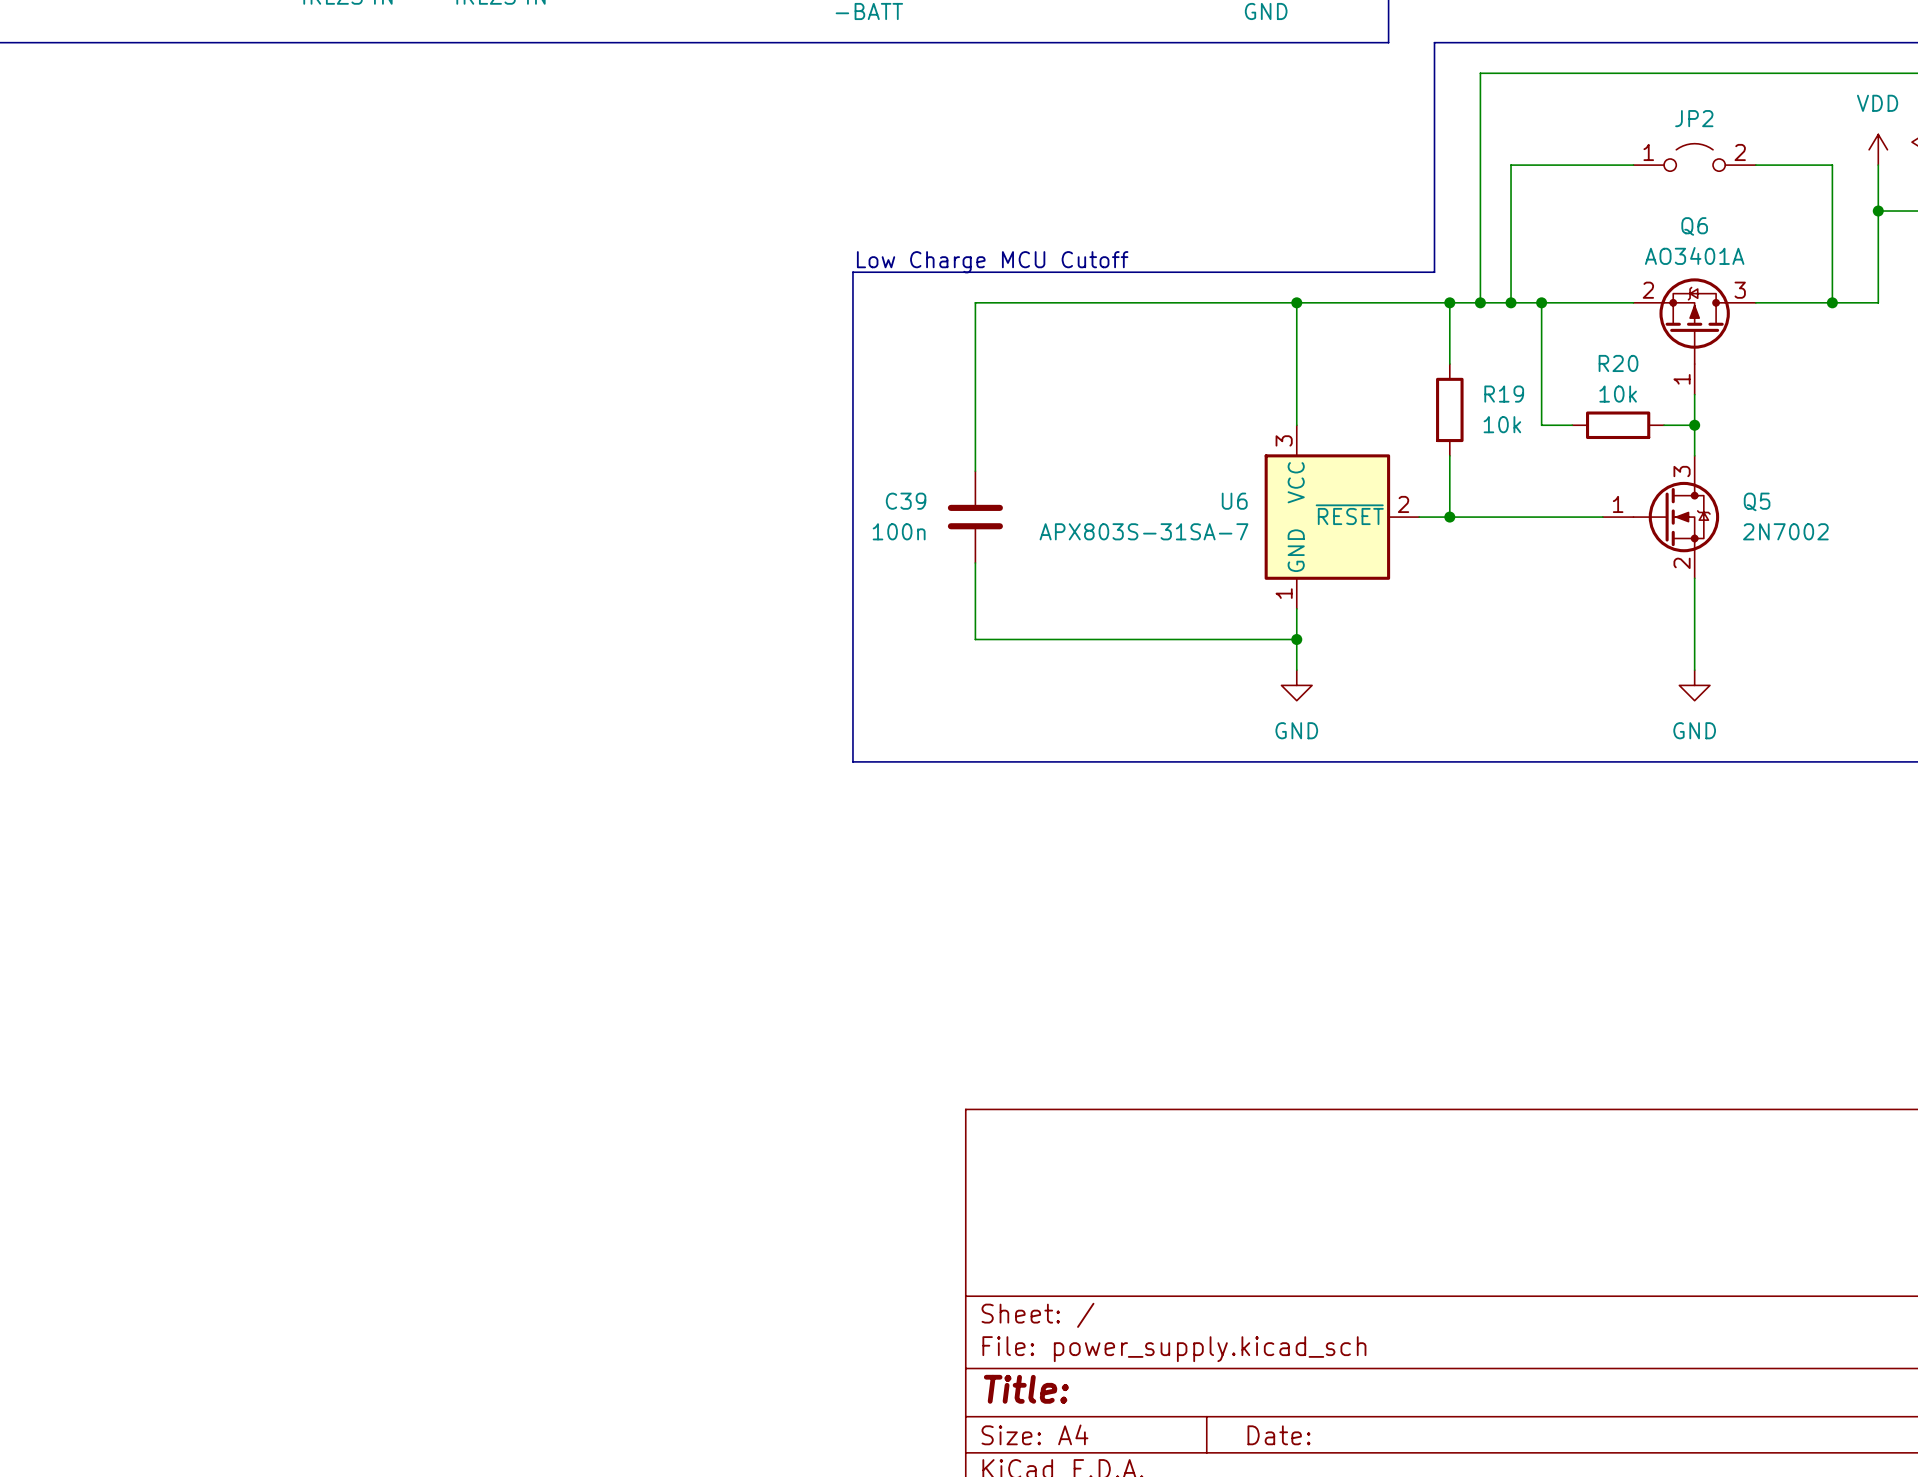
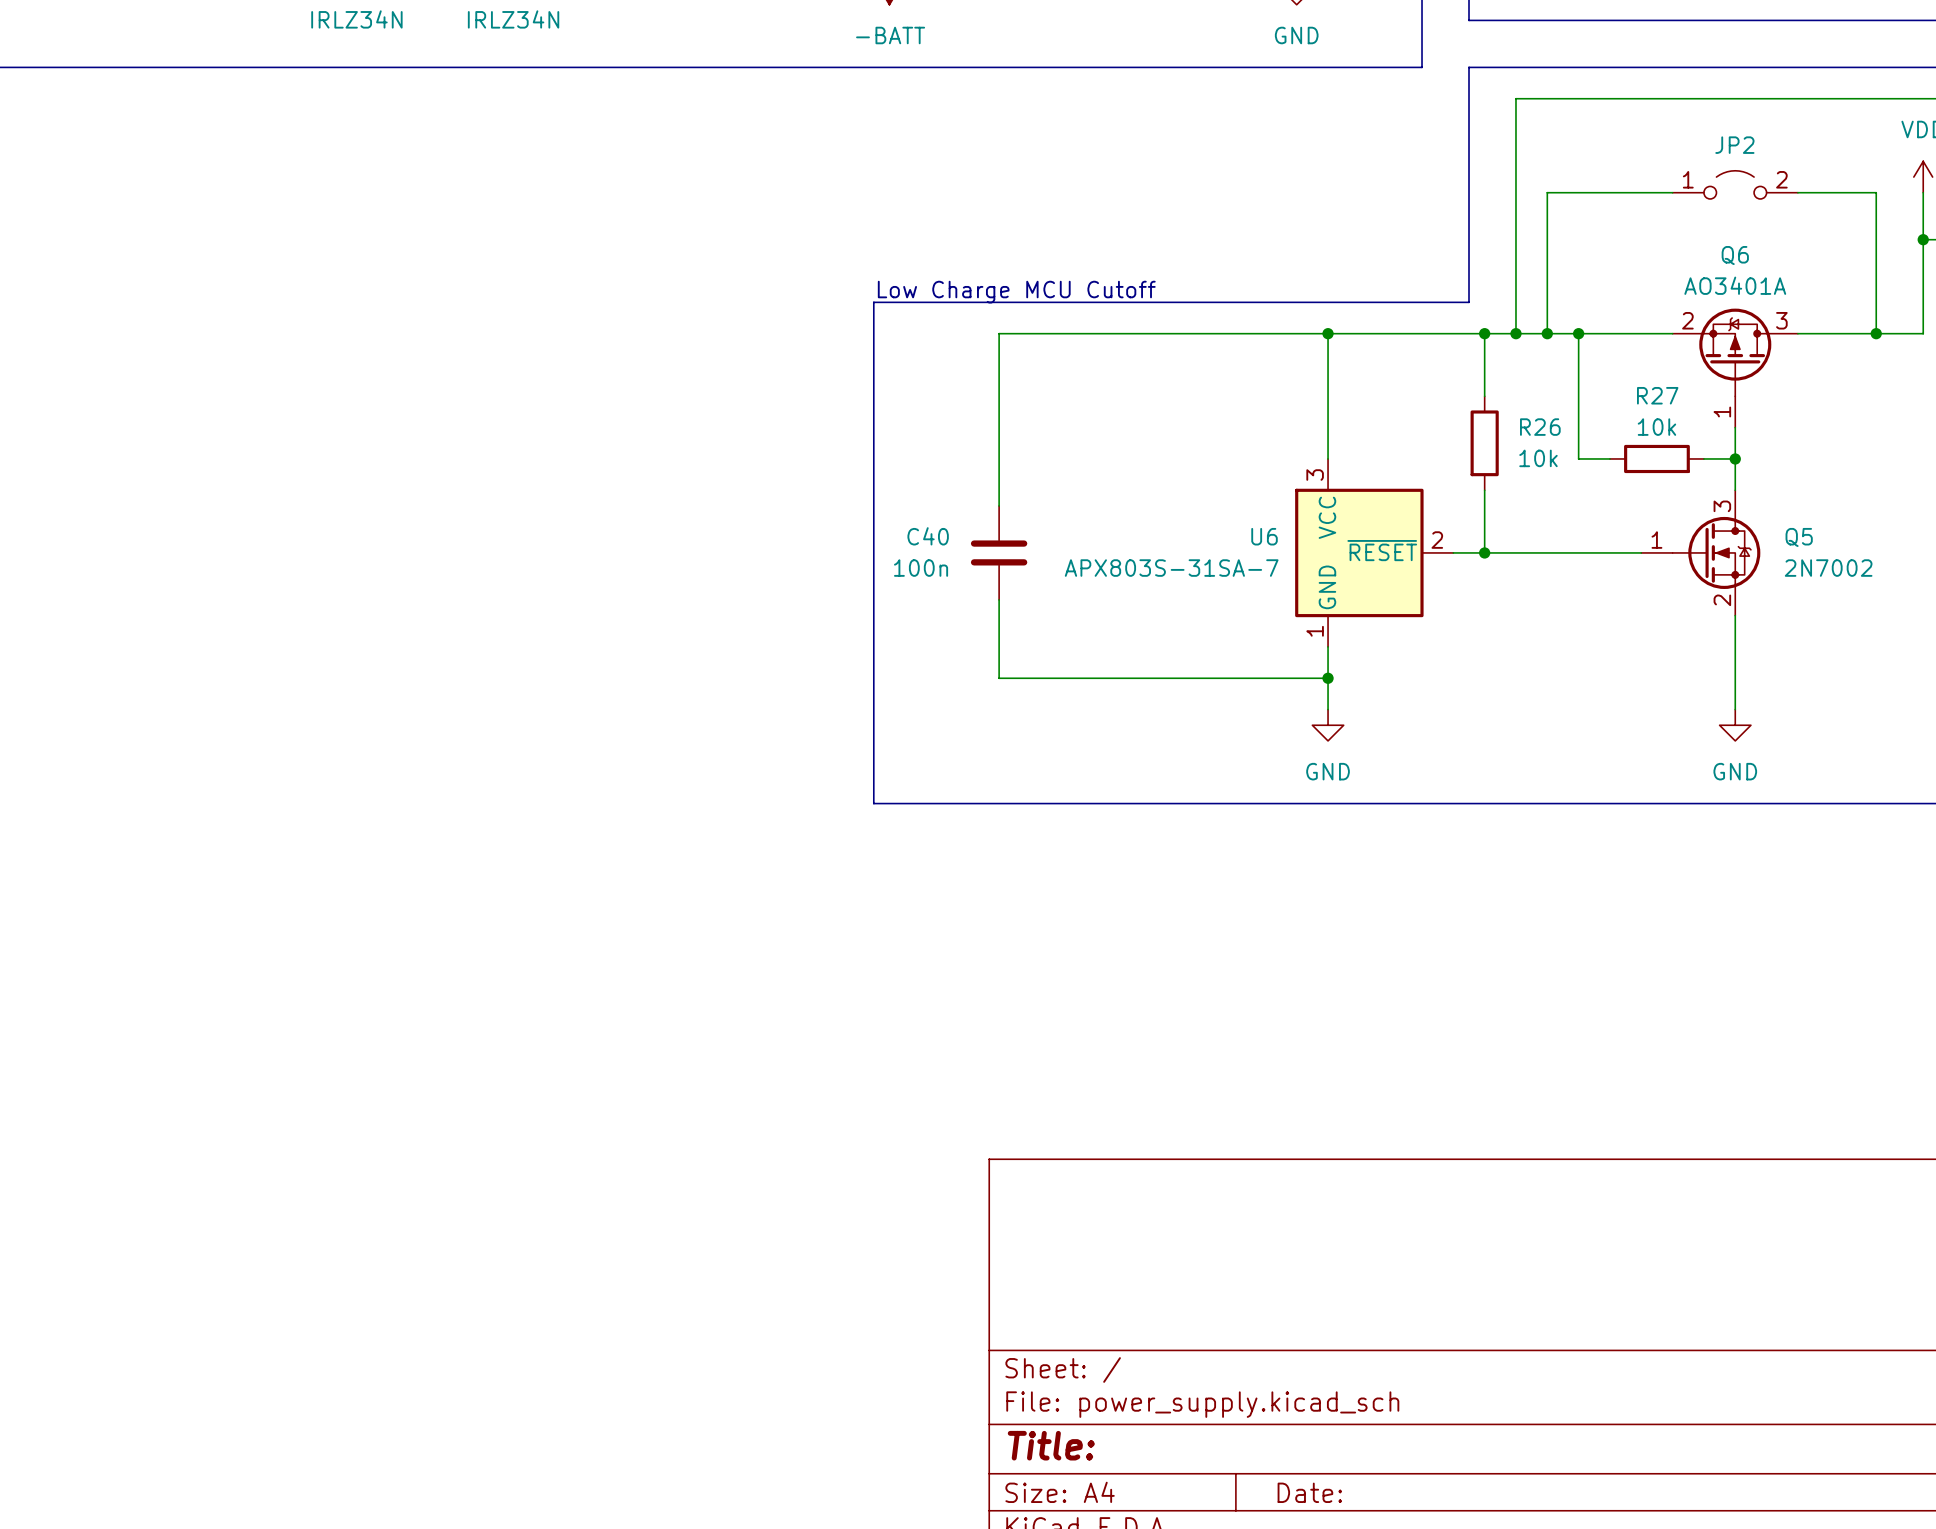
R20 name: R20 (1618, 363) -> R27 (1657, 395)
R19 name: R19 (1504, 394) -> R26 (1540, 427)
C39 name: C39 (906, 501) -> C40 (928, 536)

